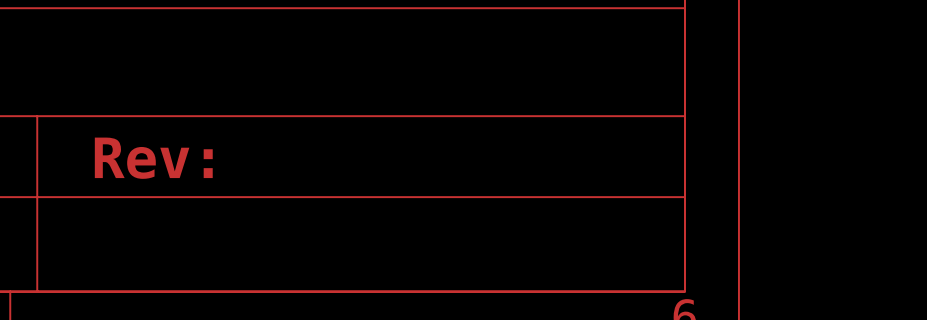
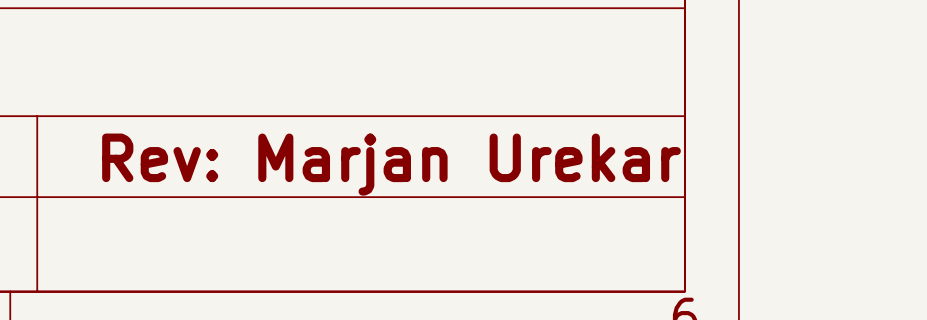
title block: Rev: (153, 158) -> Rev: Marjan Urekar (391, 164)

